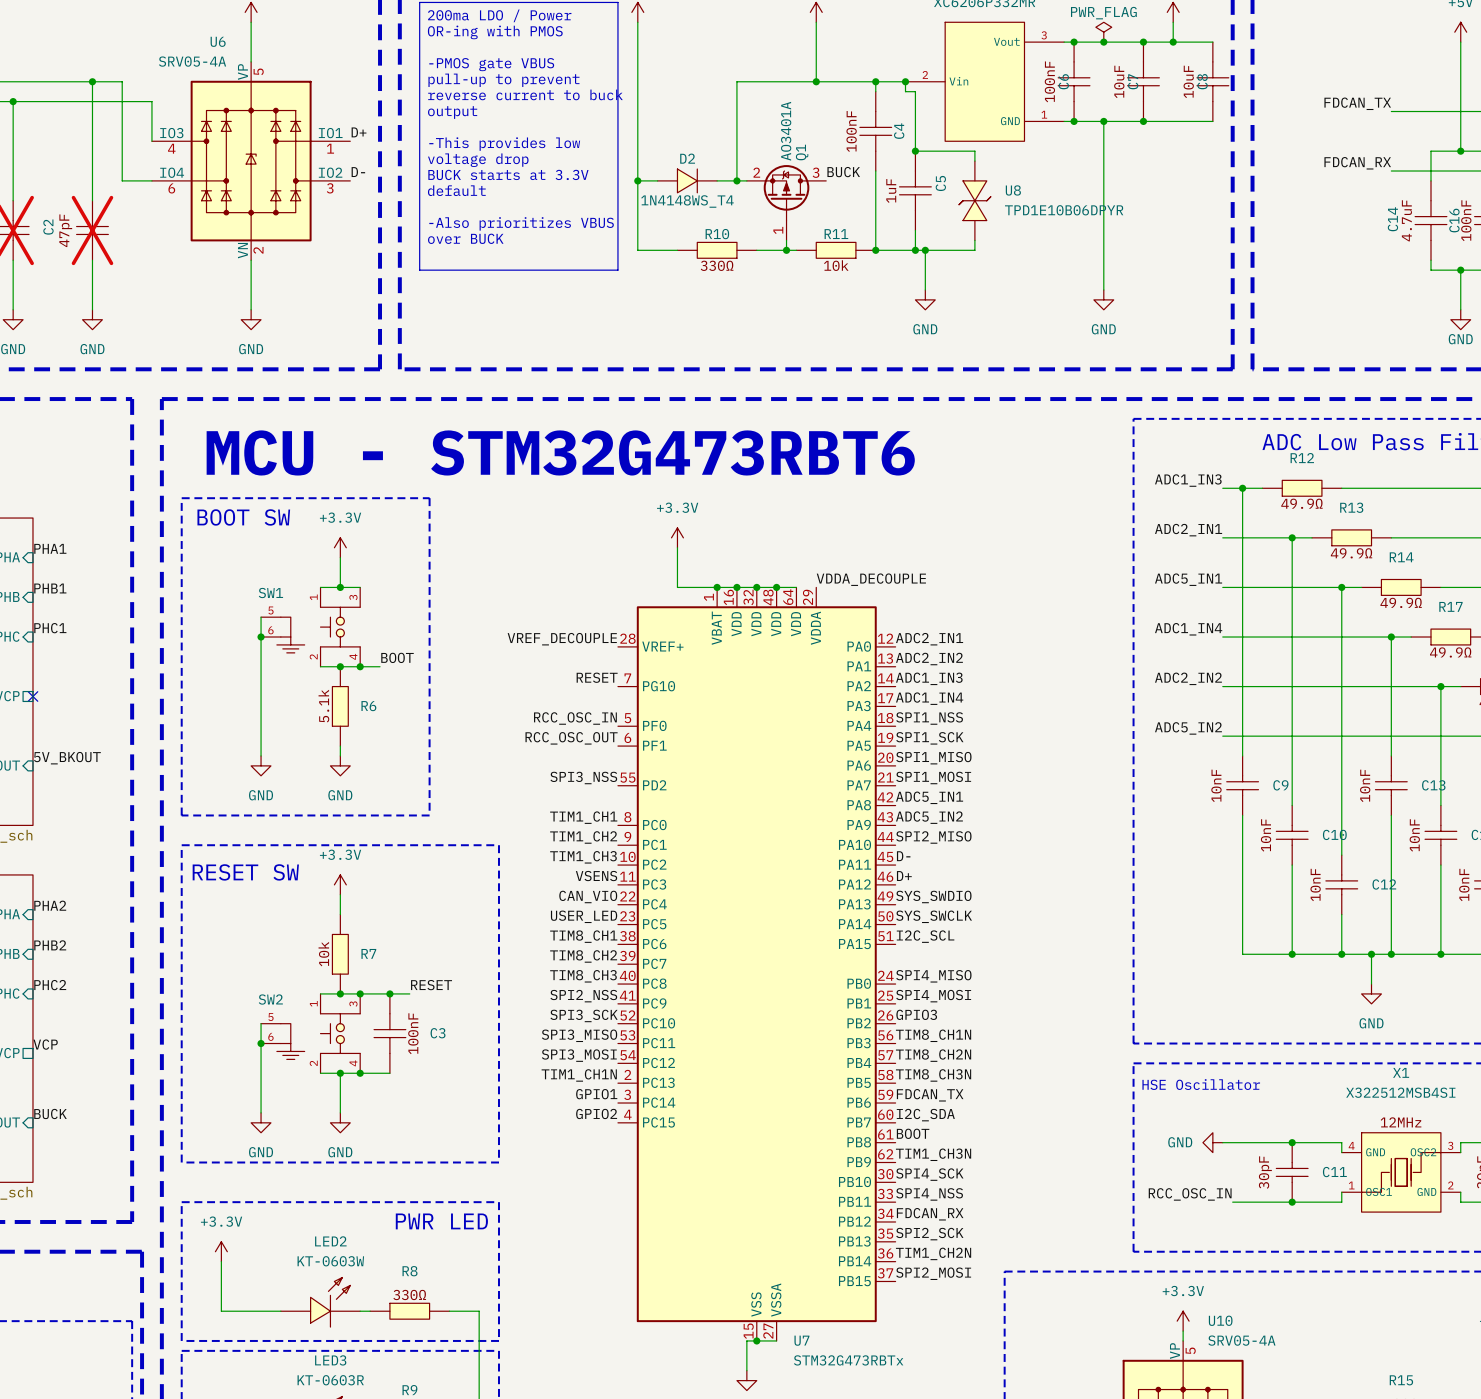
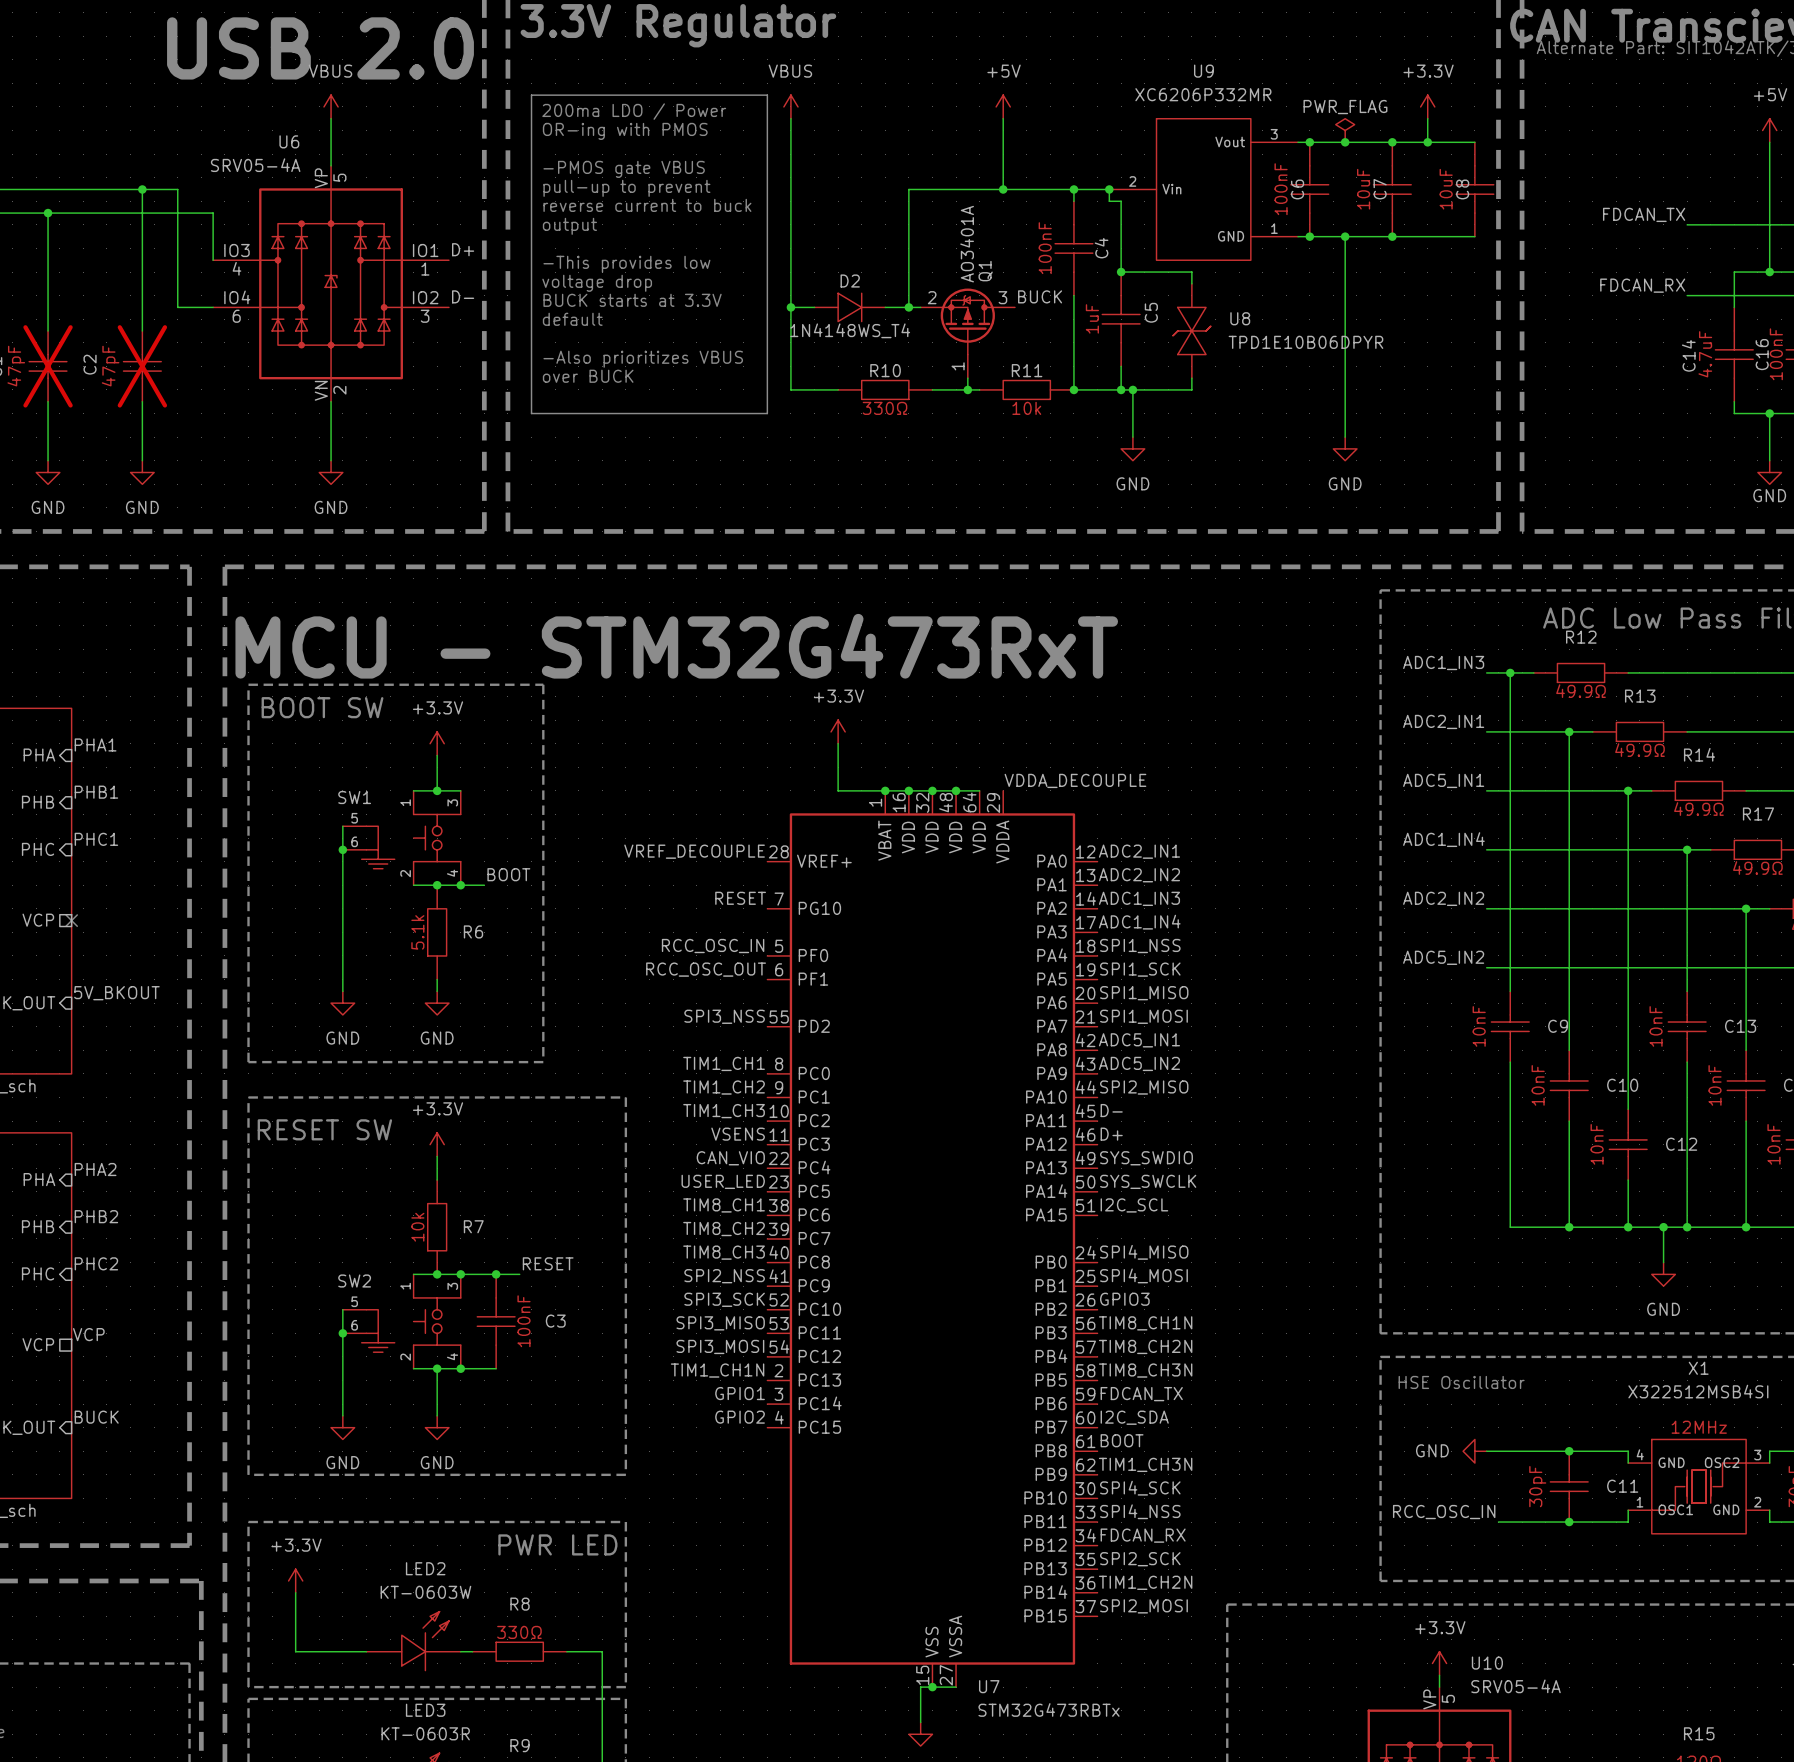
text: MCU - STM32G473RBT6 (560, 452) -> MCU - STM32G473RxT (676, 646)

